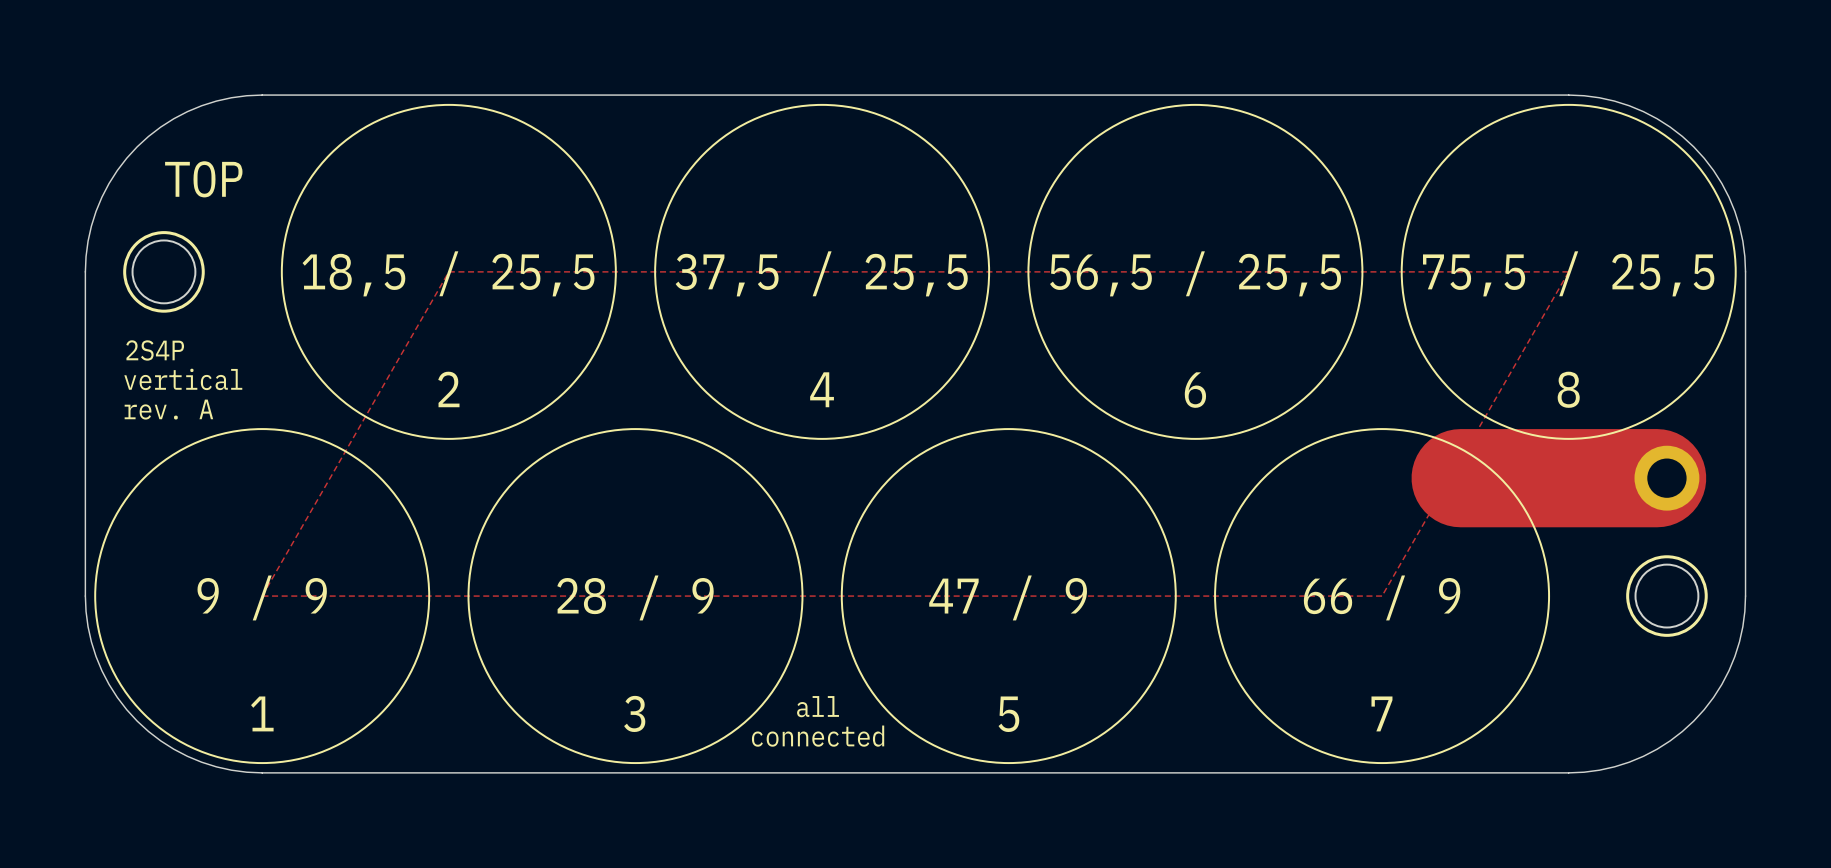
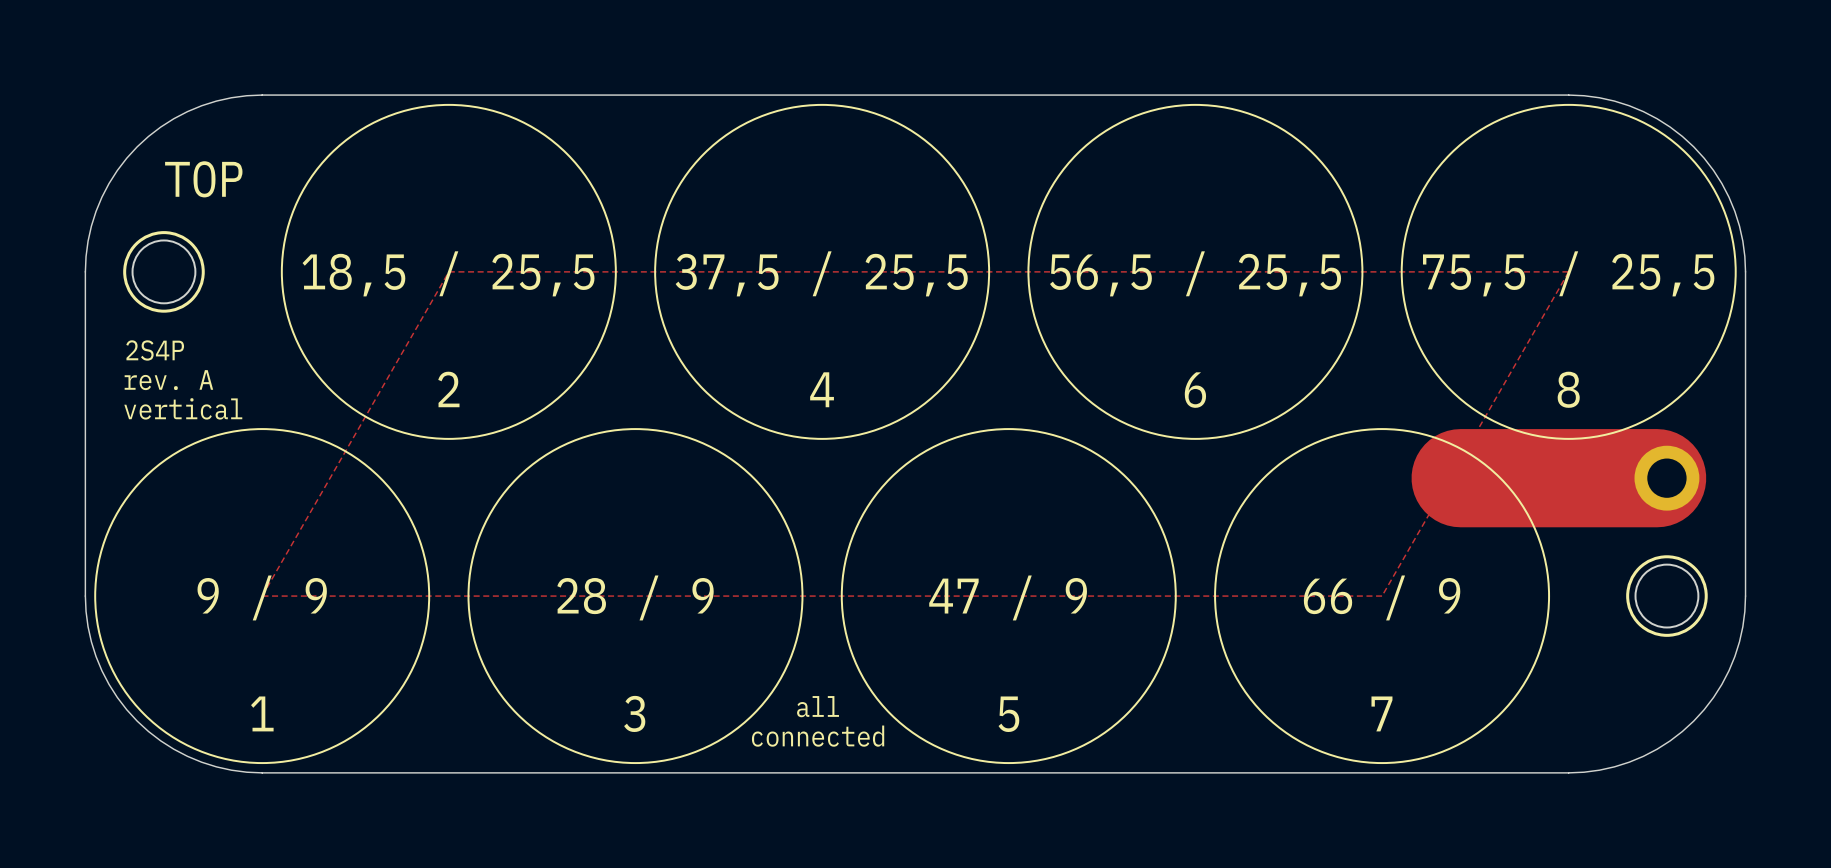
text: vertical (183, 379) -> rev. A (168, 380)
text: rev. A (168, 409) -> vertical (183, 408)

